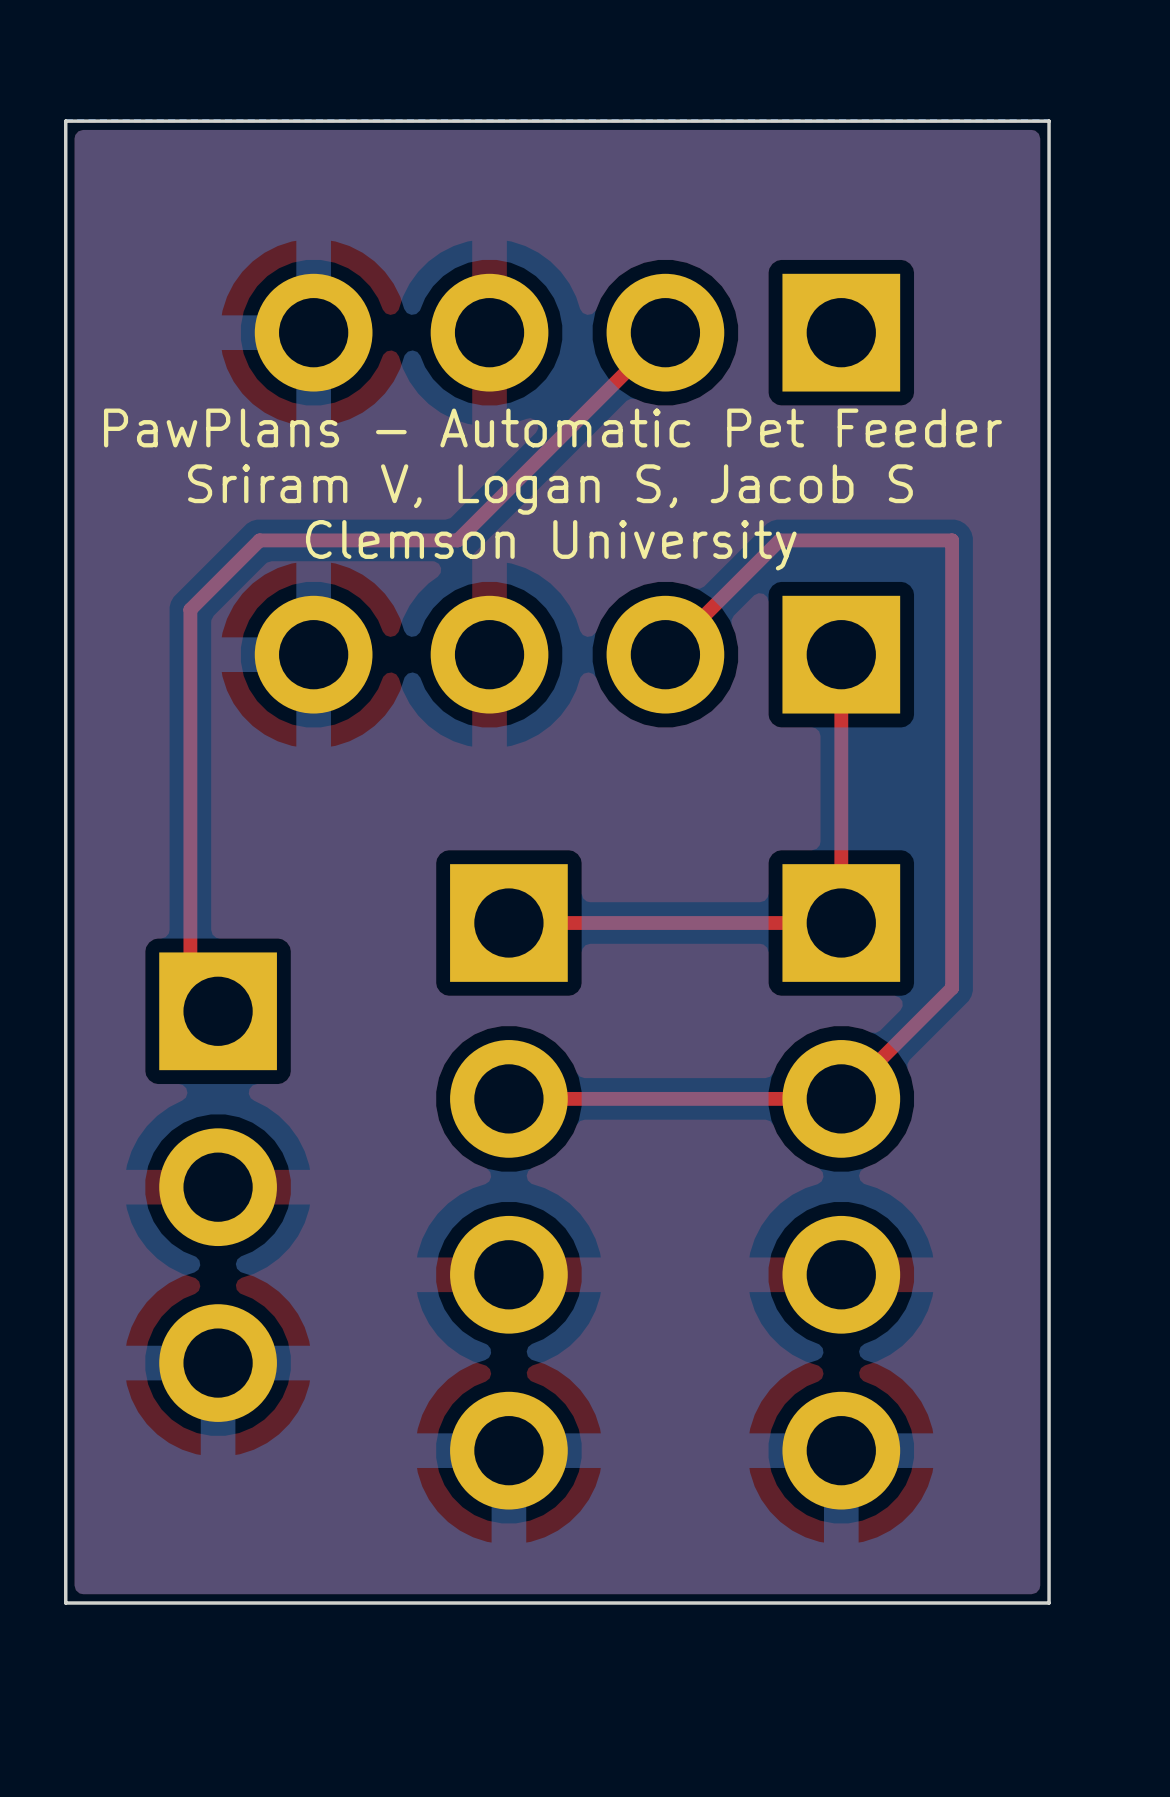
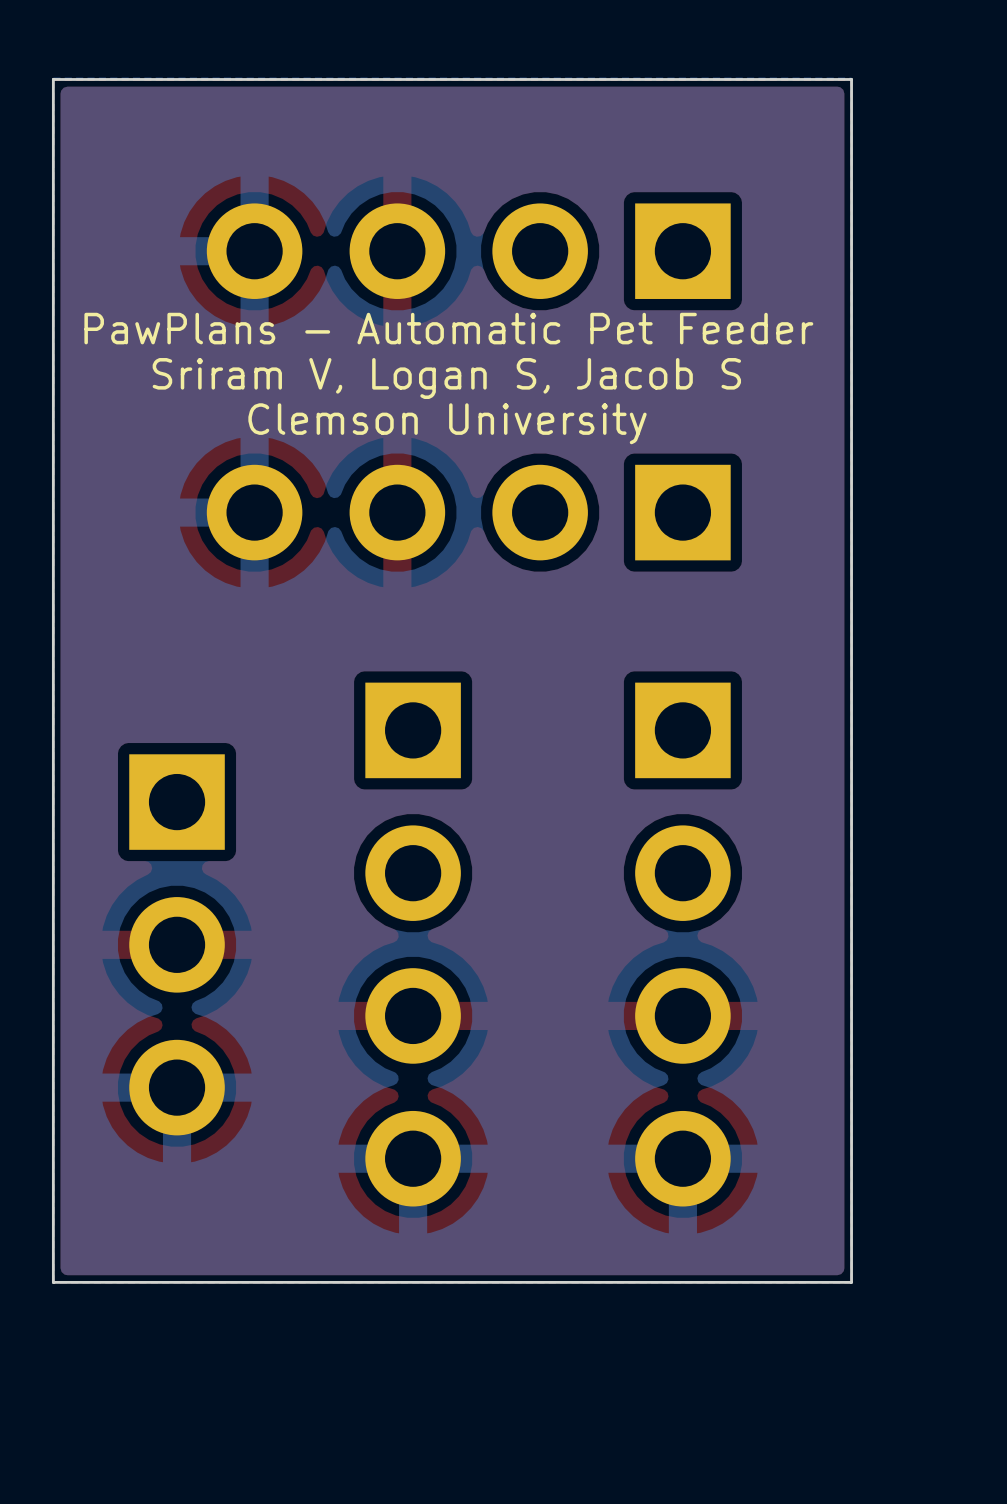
top track: (665, 332) (457, 540) (259, 540) (190, 609) (190, 983) (218, 1011) -> none
top track: (665, 654) (779, 540) (952, 540) (952, 988) (841, 1098) (508, 1098) -> none
top track: (841, 654) (841, 923) (508, 923) -> none

